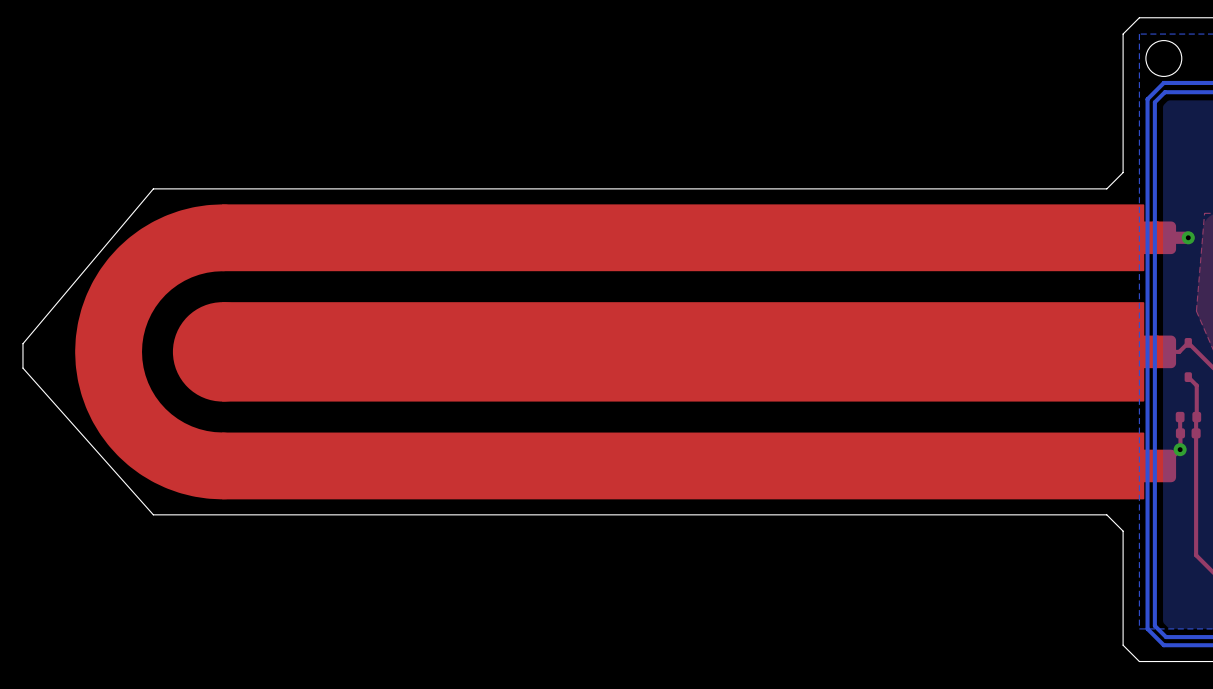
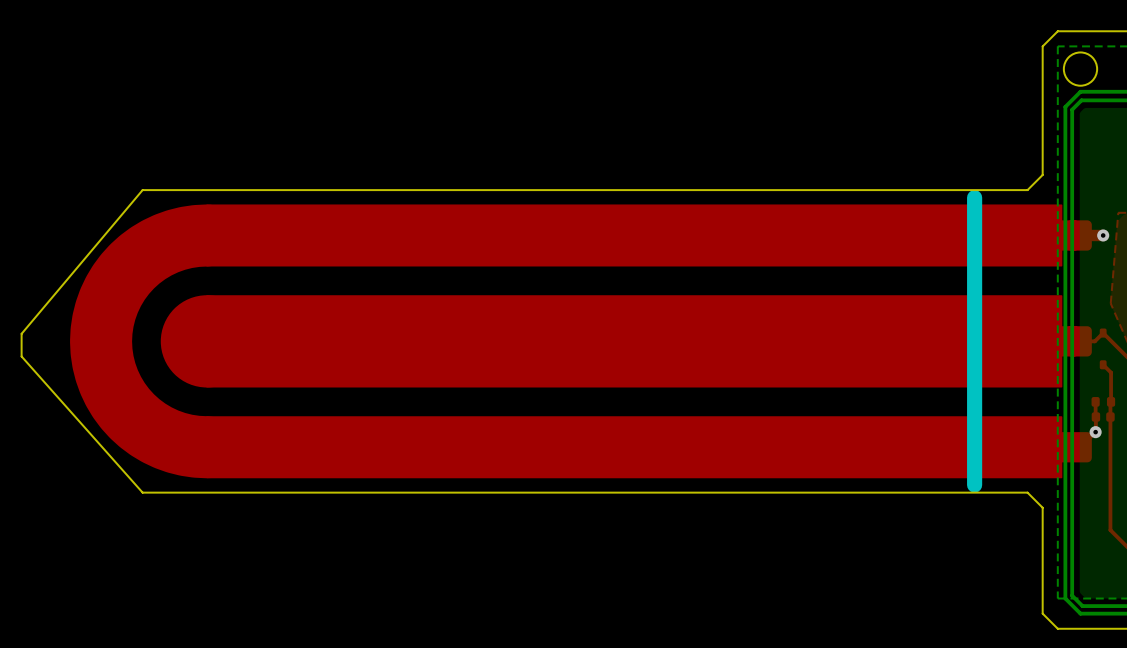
line: none -> (974, 197) (974, 485)

